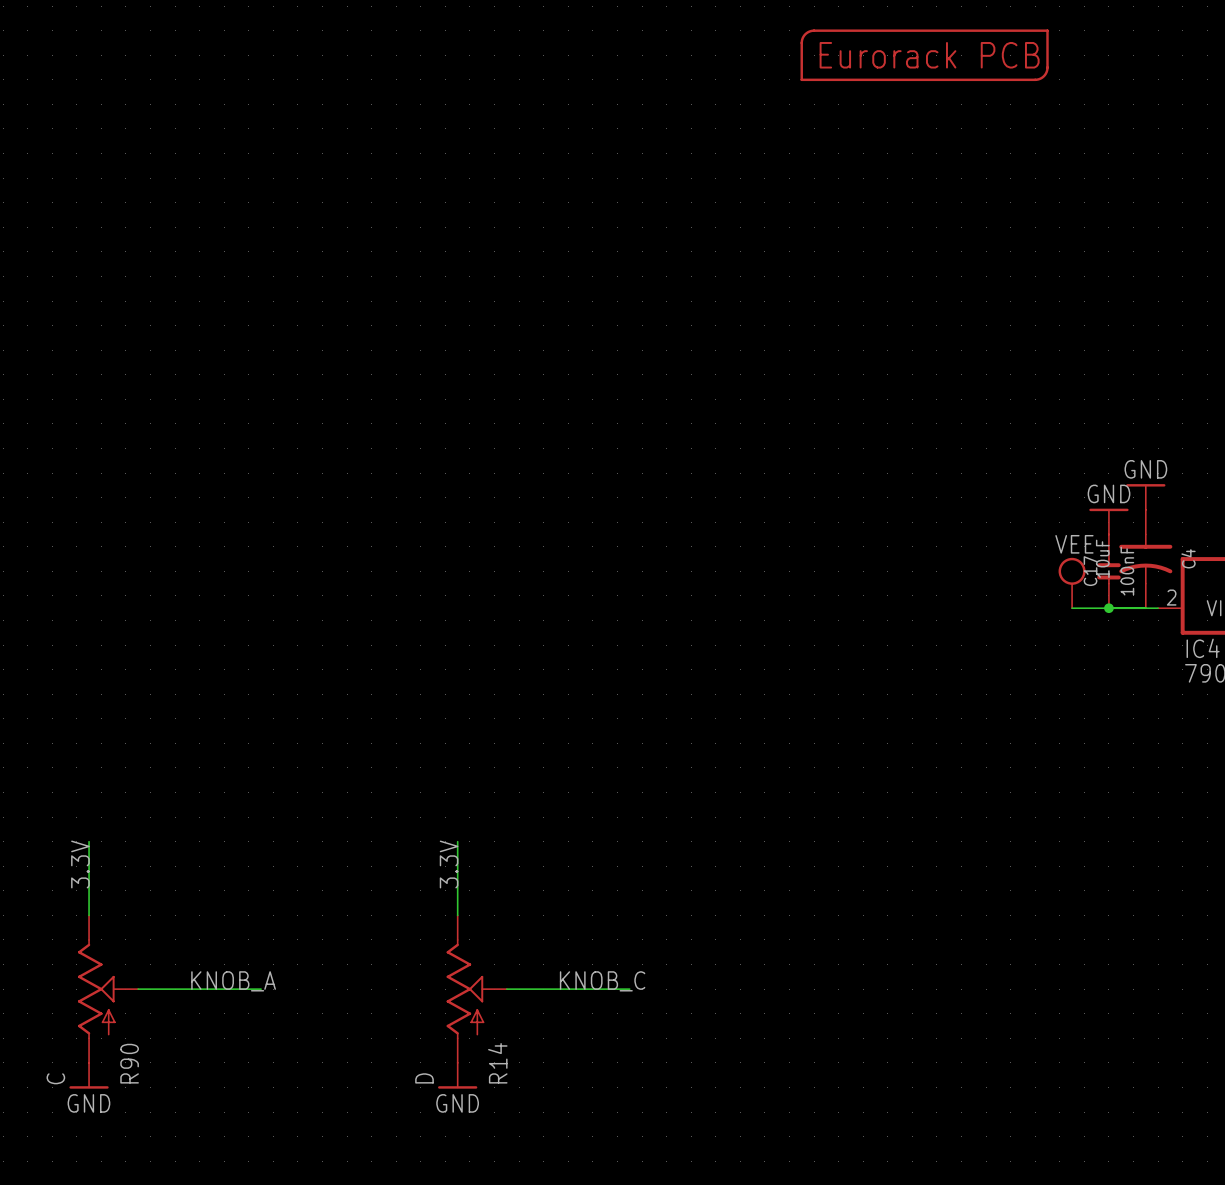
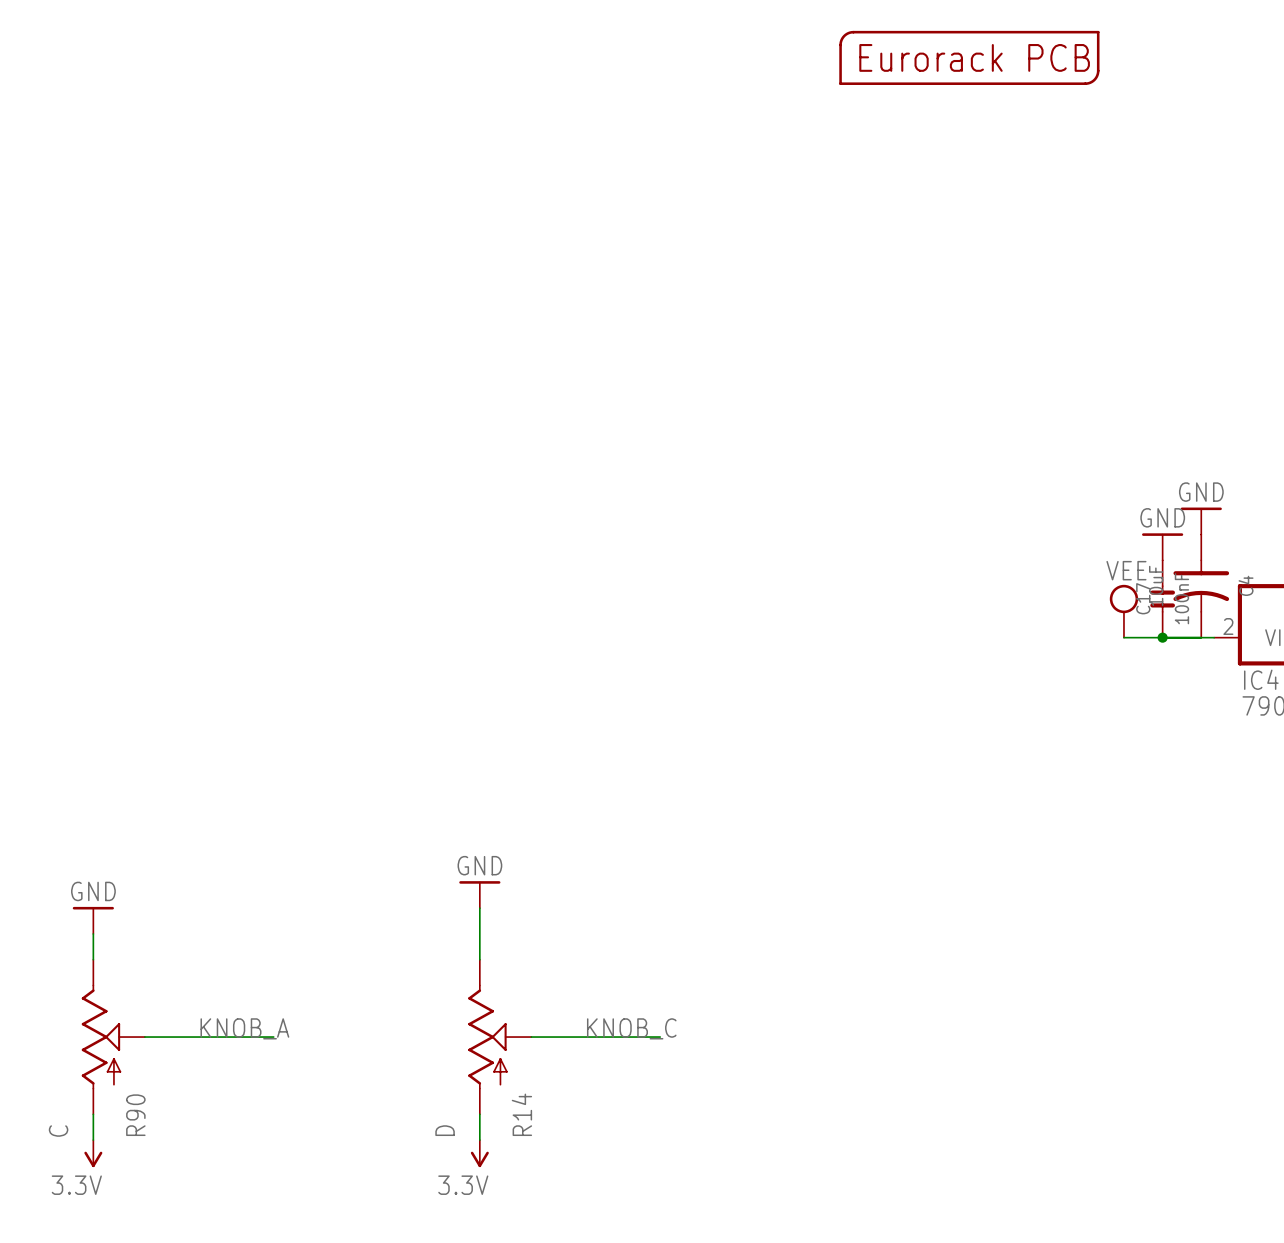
power symbol: none -> GND (479, 894)
label: 3.3V (80, 864) -> none
label: 3.3V (449, 864) -> none
power symbol position: GND (89, 1075) -> GND (93, 920)
power symbol: GND (457, 1075) -> none
power symbol rotation: 0° (89, 1087) -> 180° (93, 908)
power symbol: none -> 3.3V (93, 1153)
power symbol: none -> 3.3V (479, 1153)

